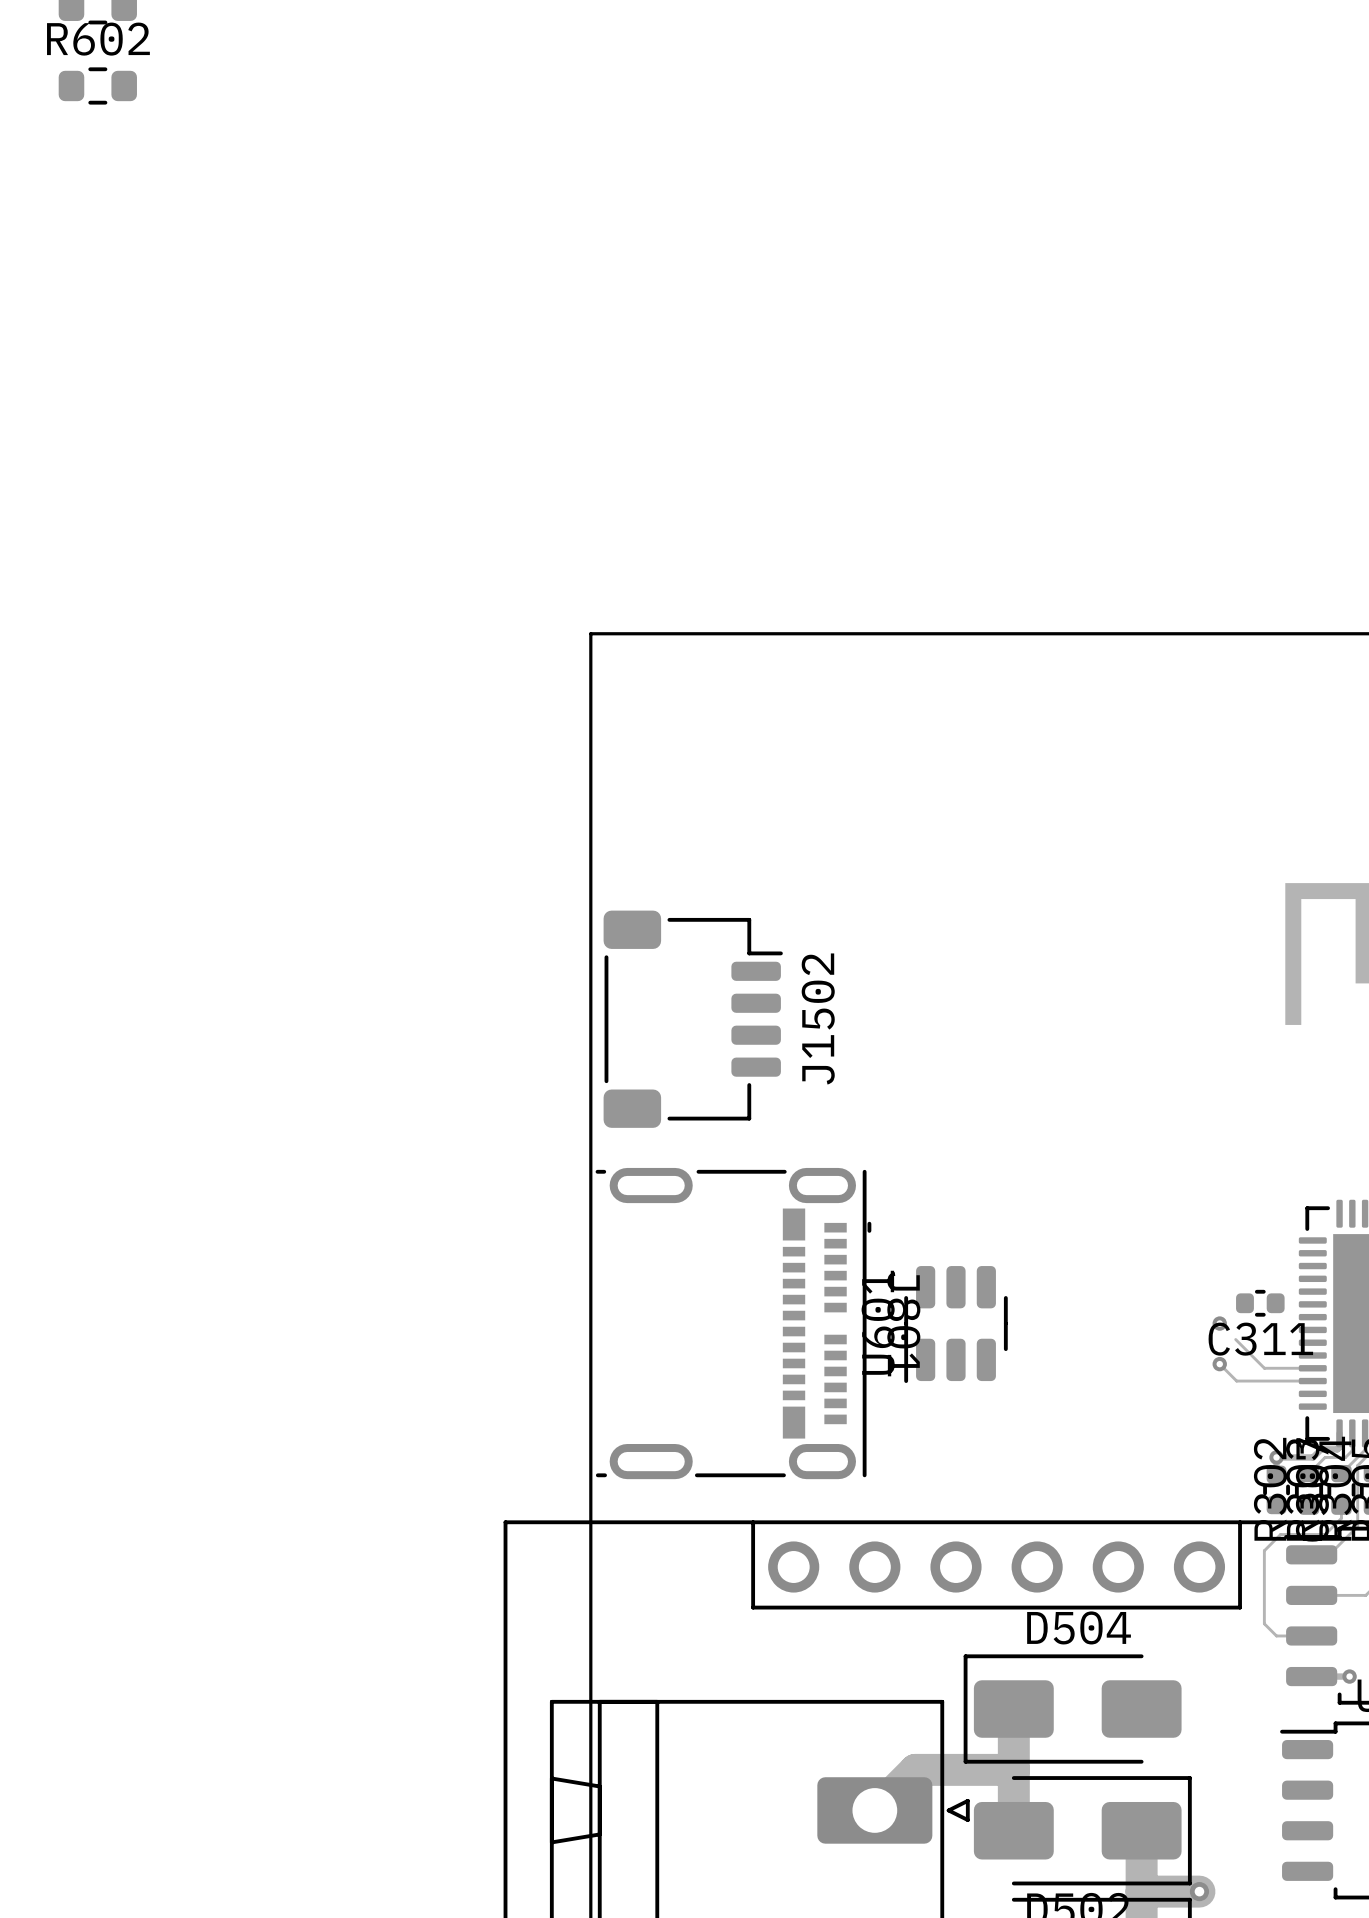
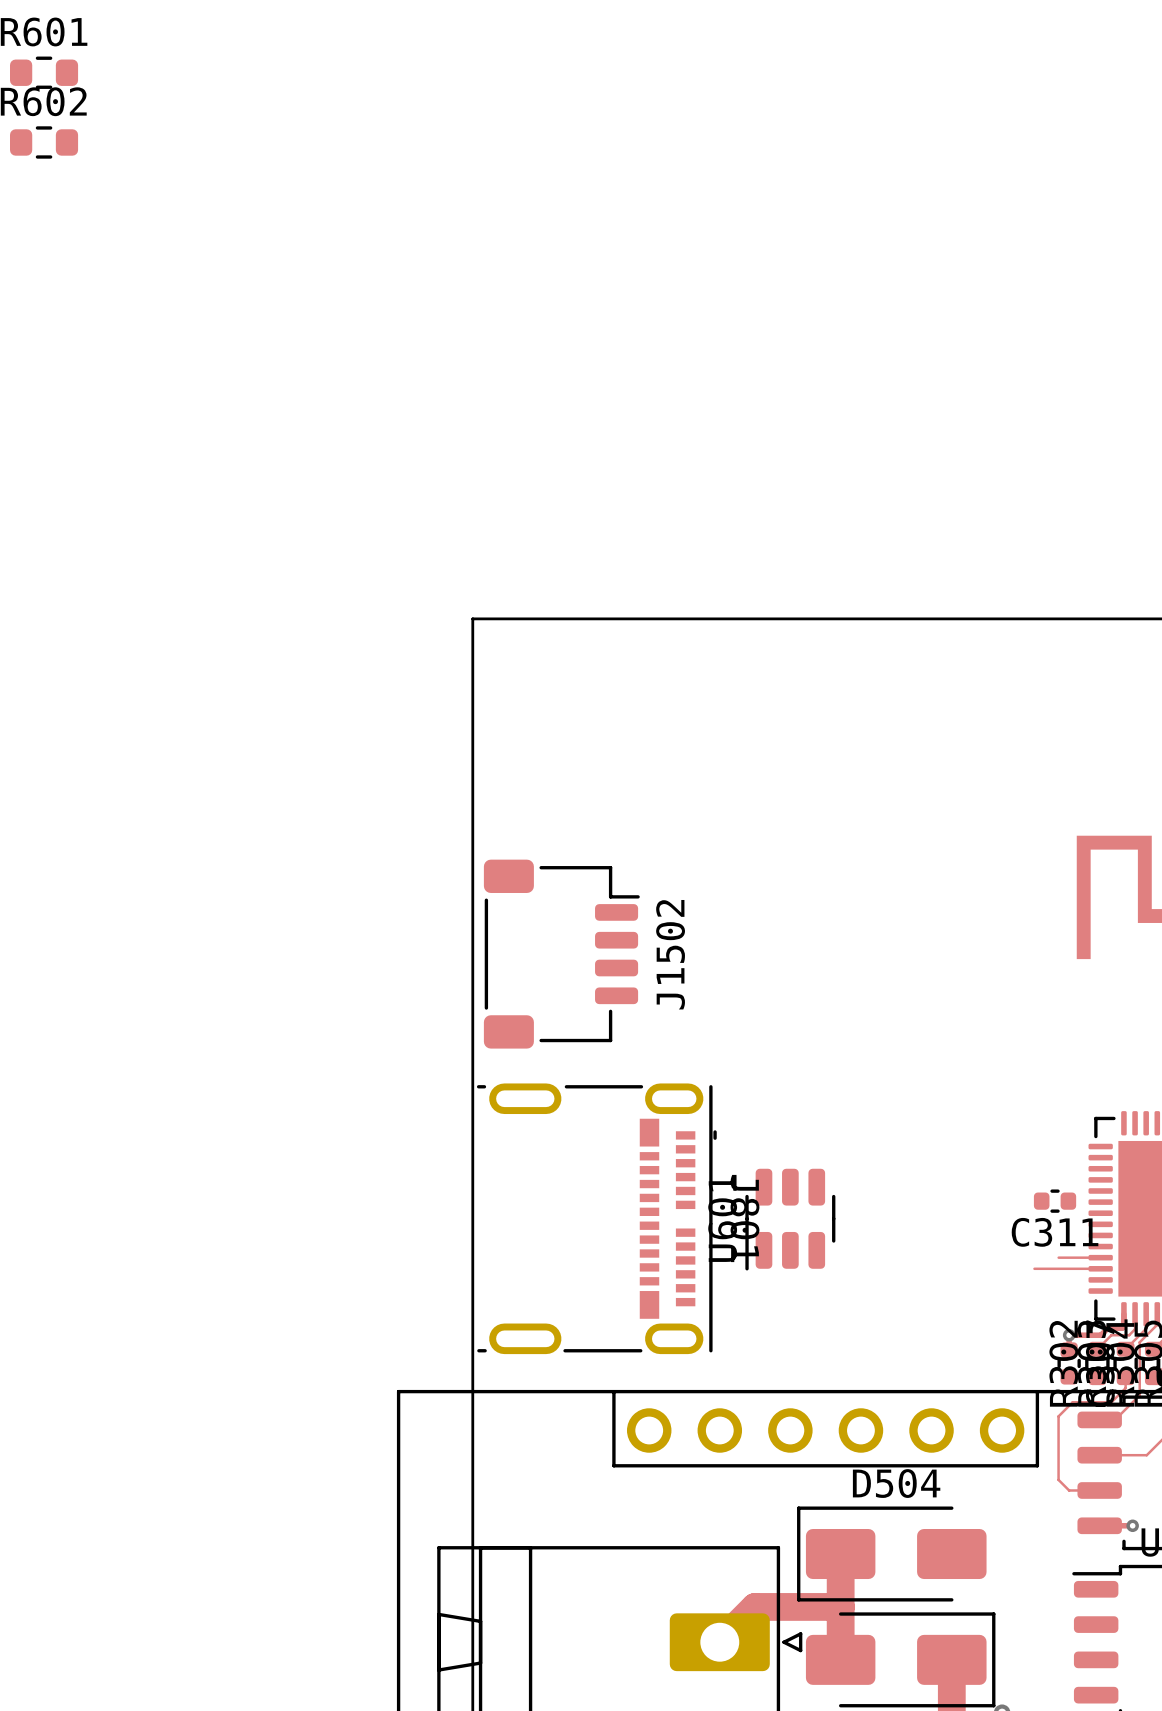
via: (1219, 1323) -> none
track: (1235, 1339) (1264, 1368) -> none
track: (1219, 1364) (1236, 1381) -> none
via: (1219, 1364) -> none

